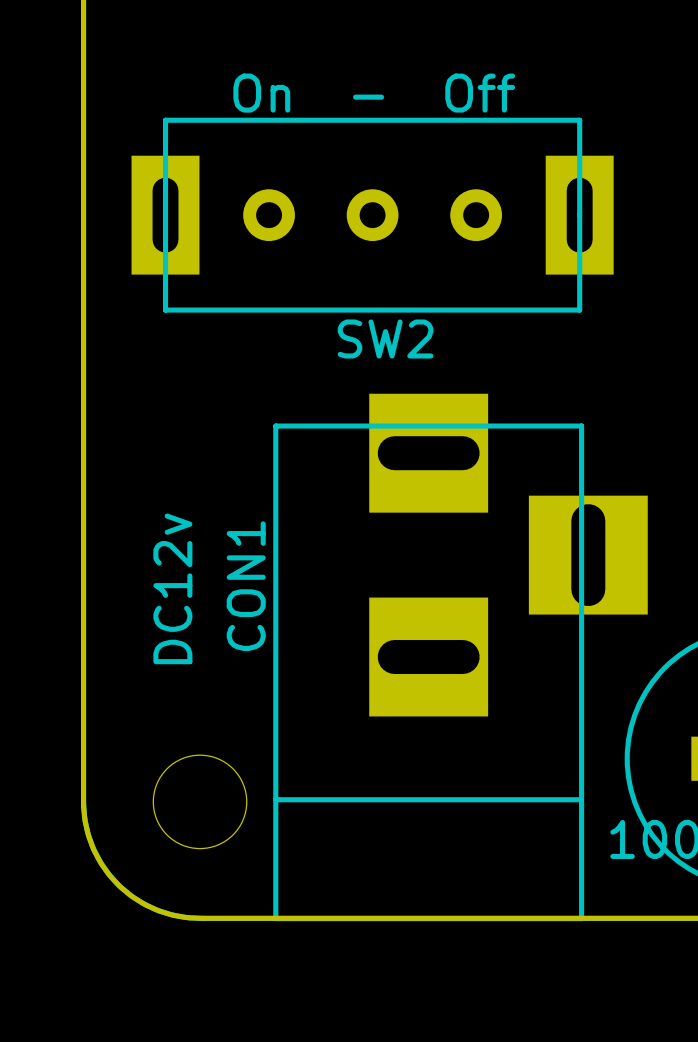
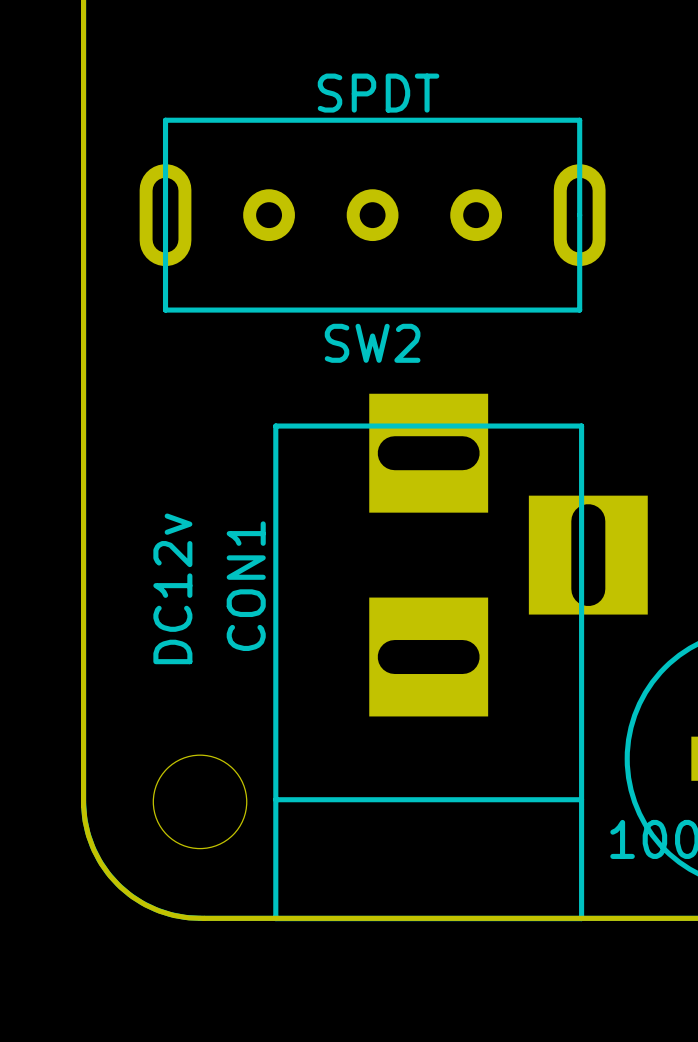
SW2 value: On - Off (374, 93) -> SPDT (378, 93)
SW2 footprint: [131, 117, 614, 313] -> [139, 117, 606, 313]

